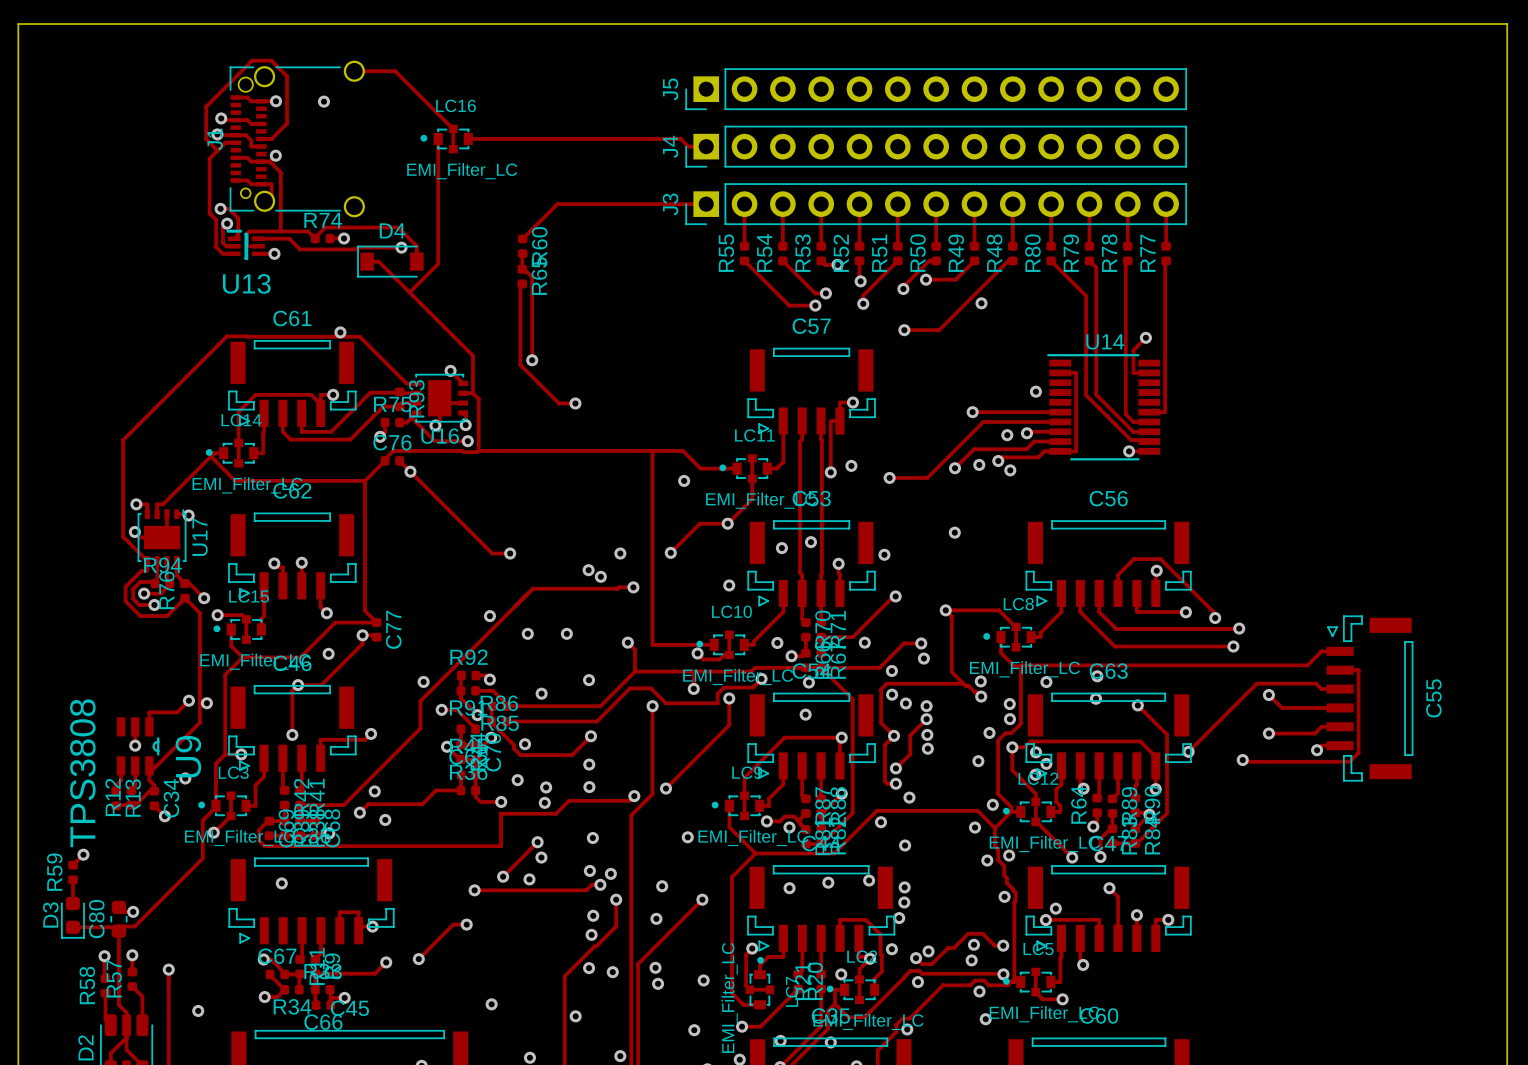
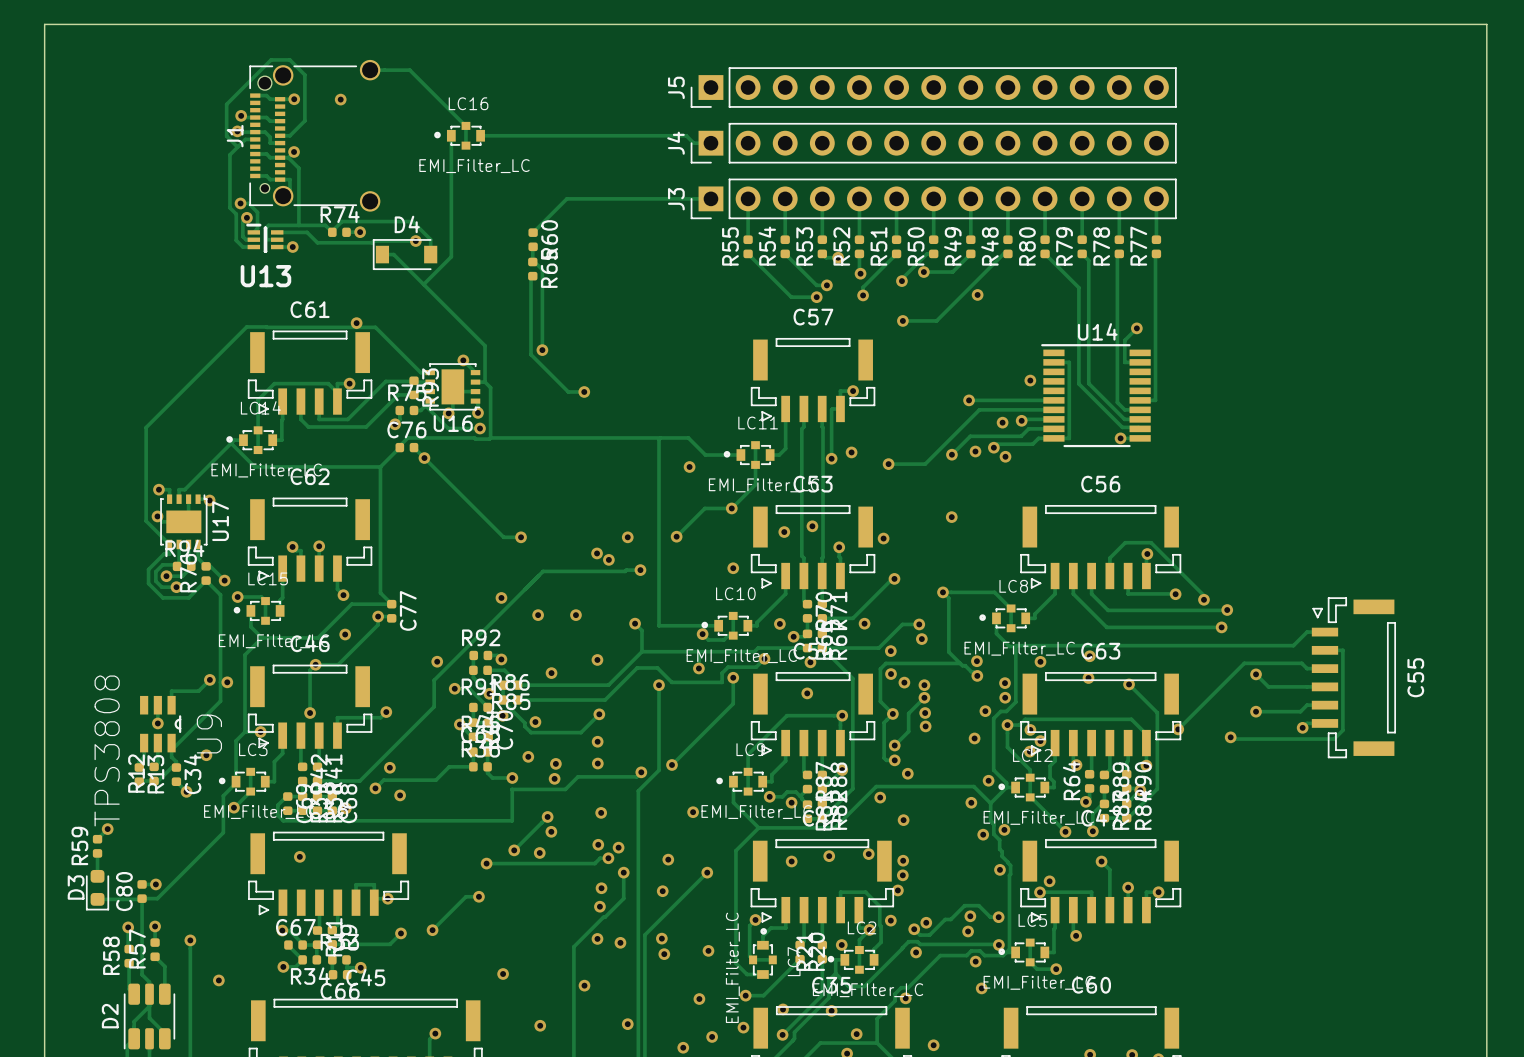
C80 footprint: [110, 900, 128, 938] -> [137, 880, 147, 903]

